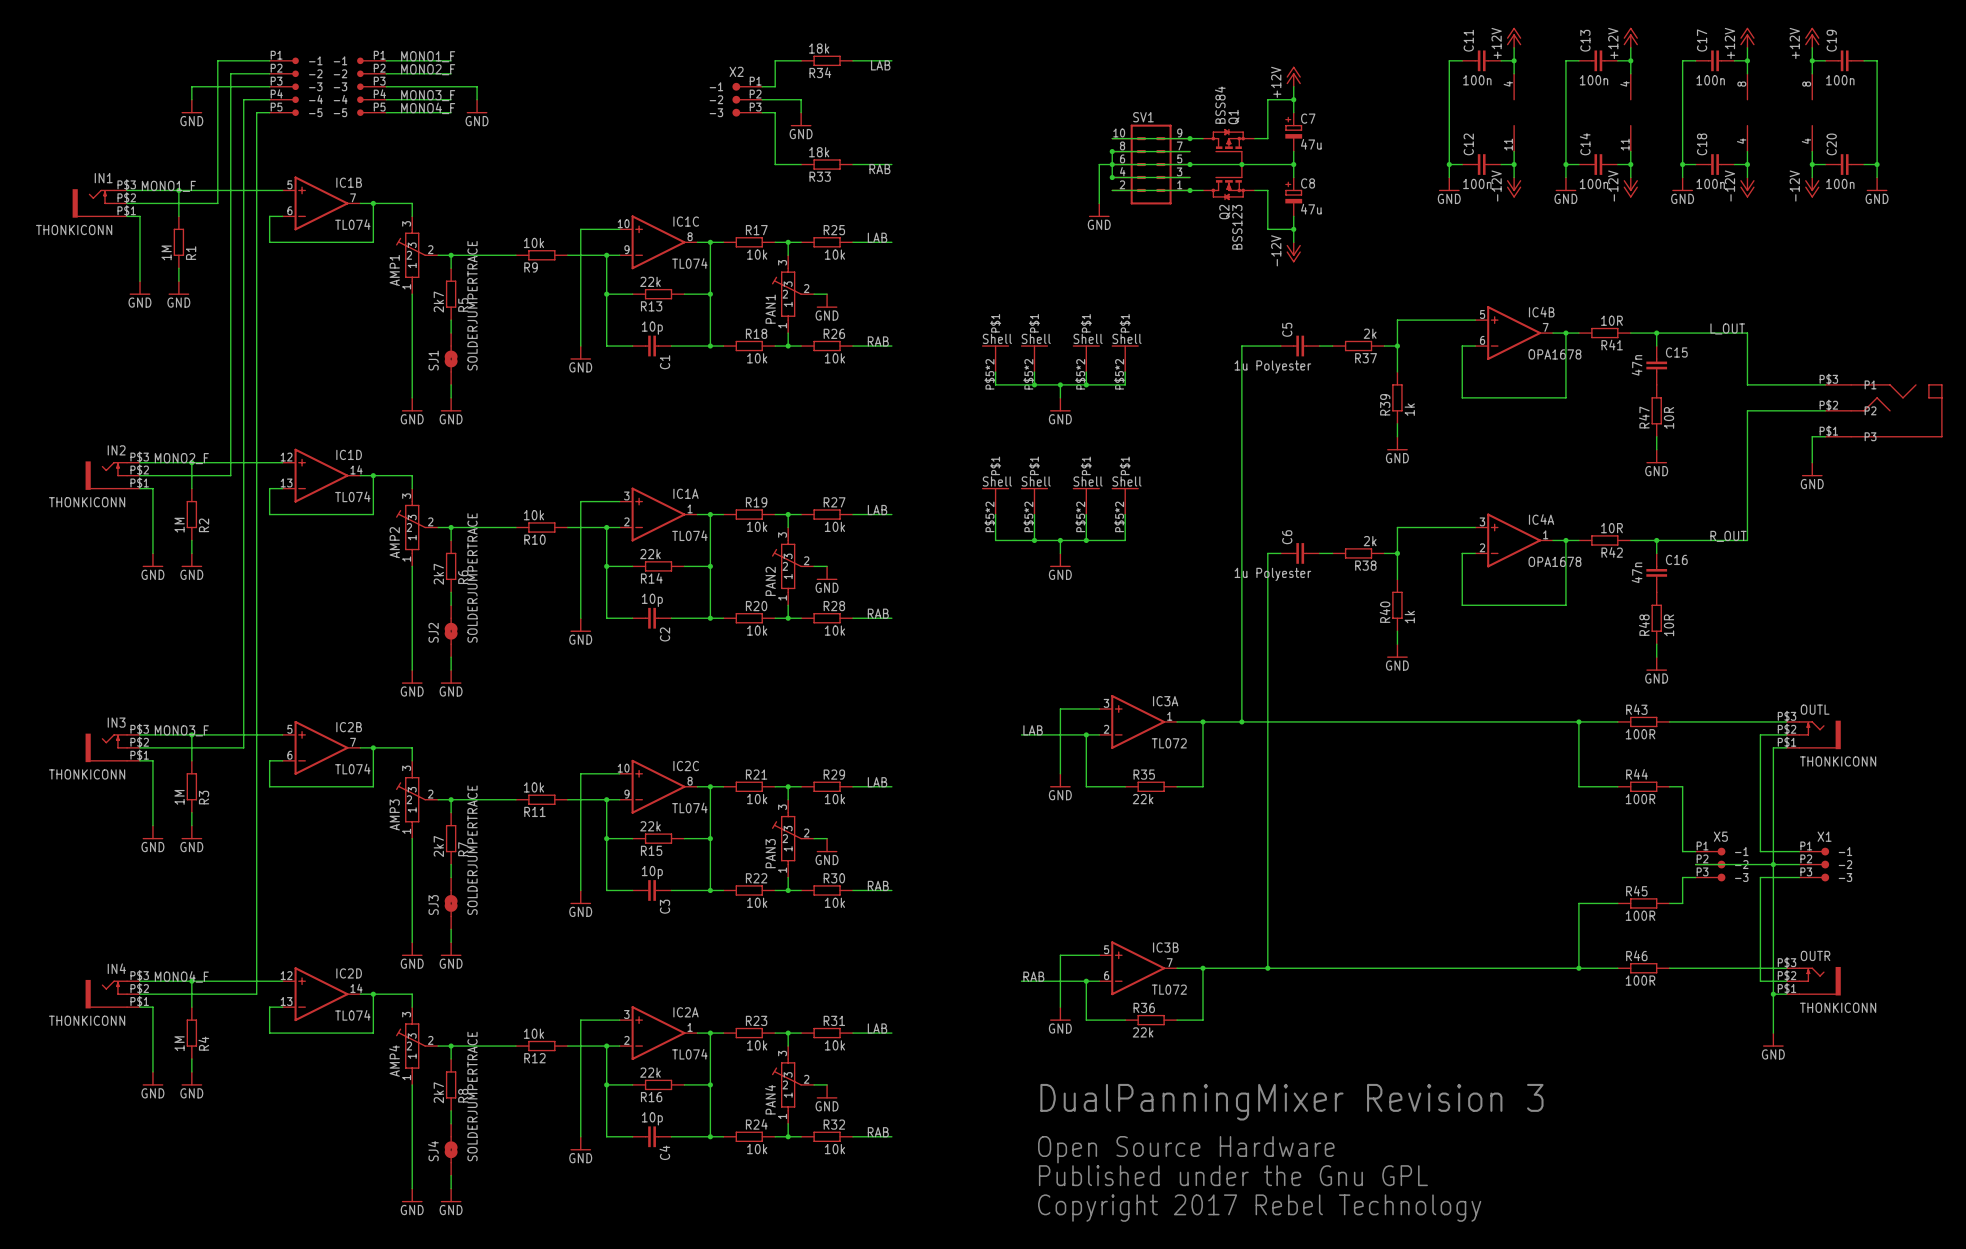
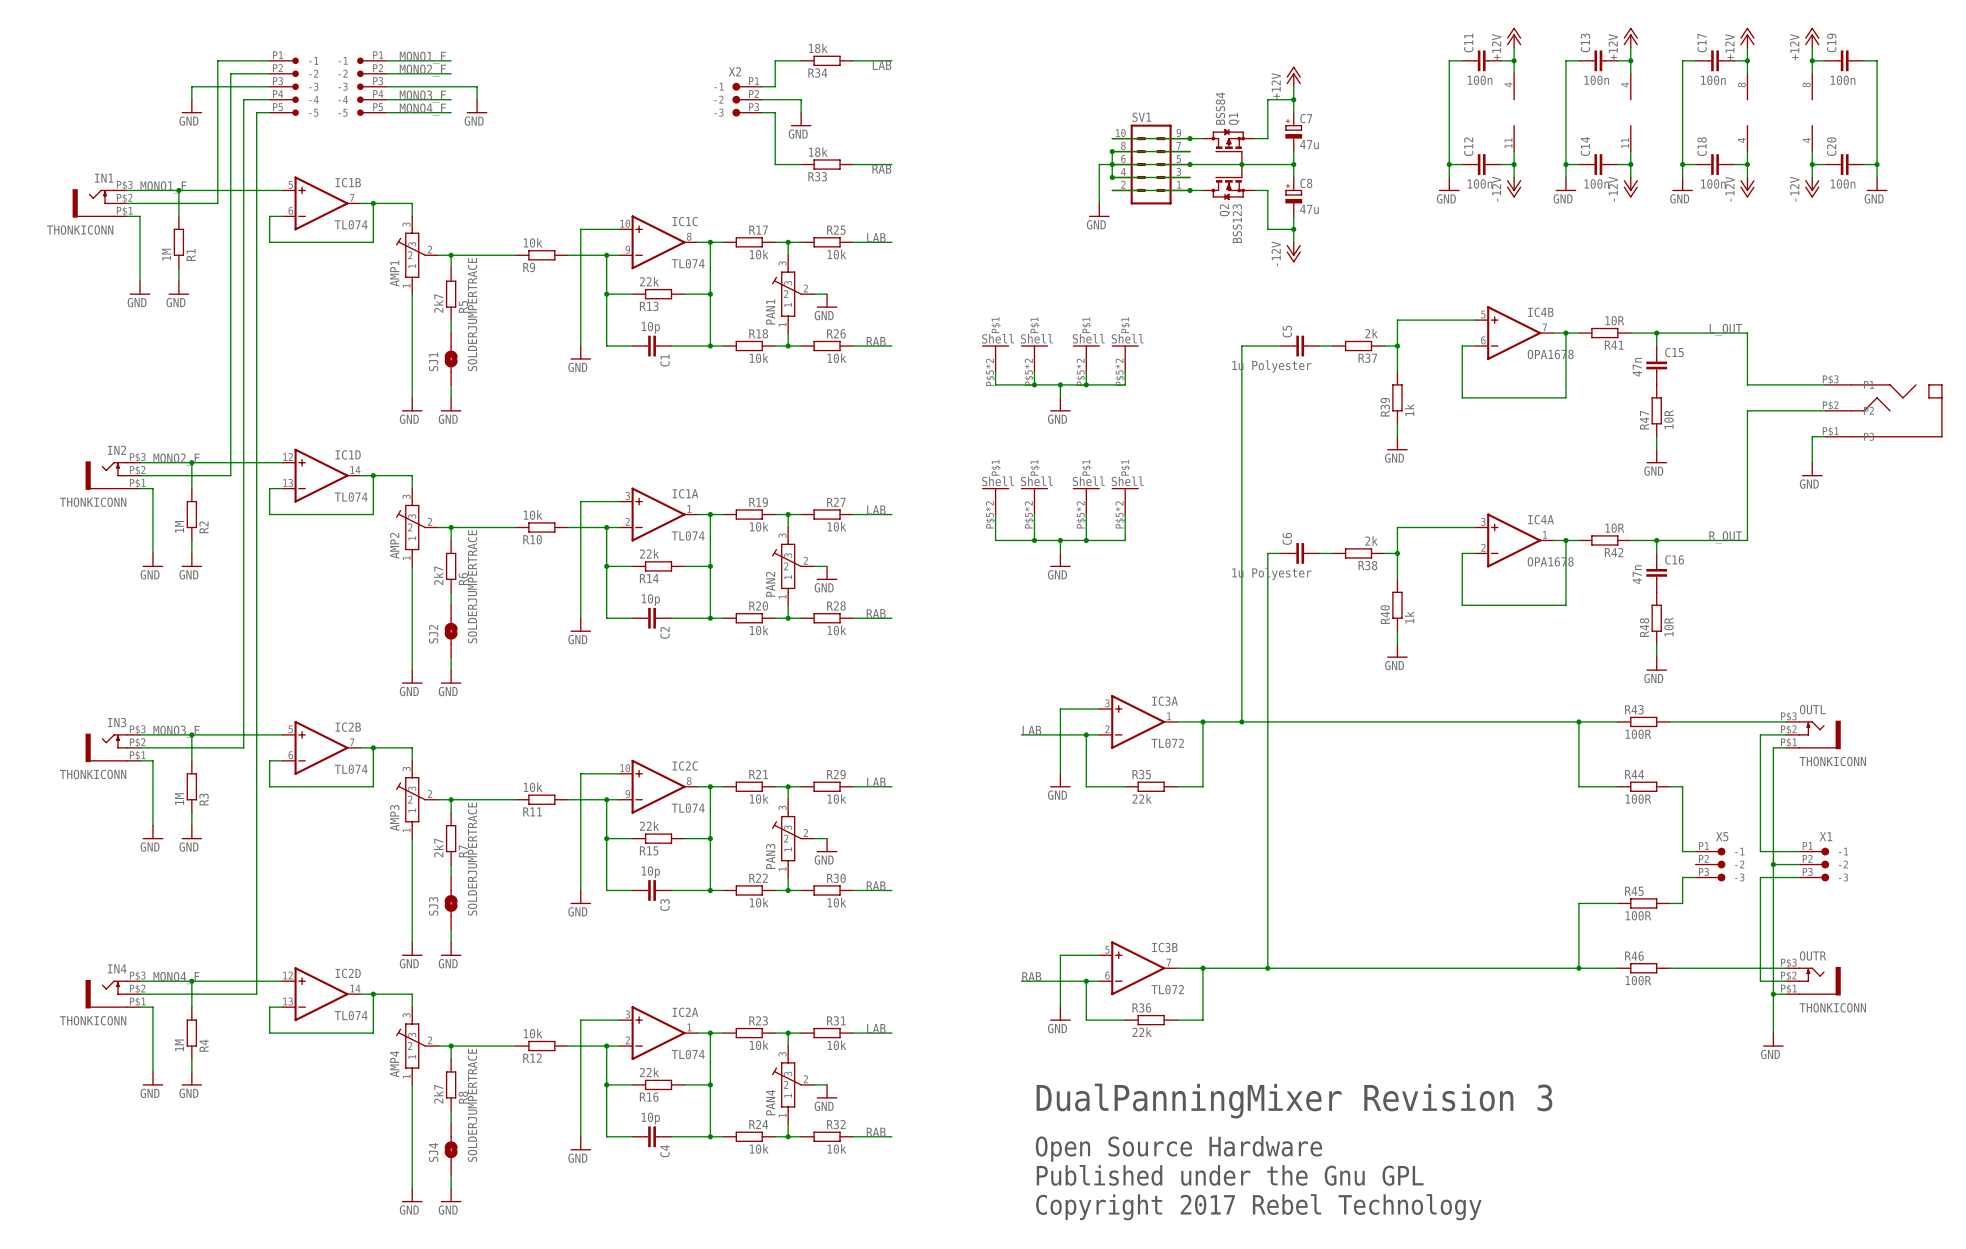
wire: (1695, 864) (1773, 864) -> none

